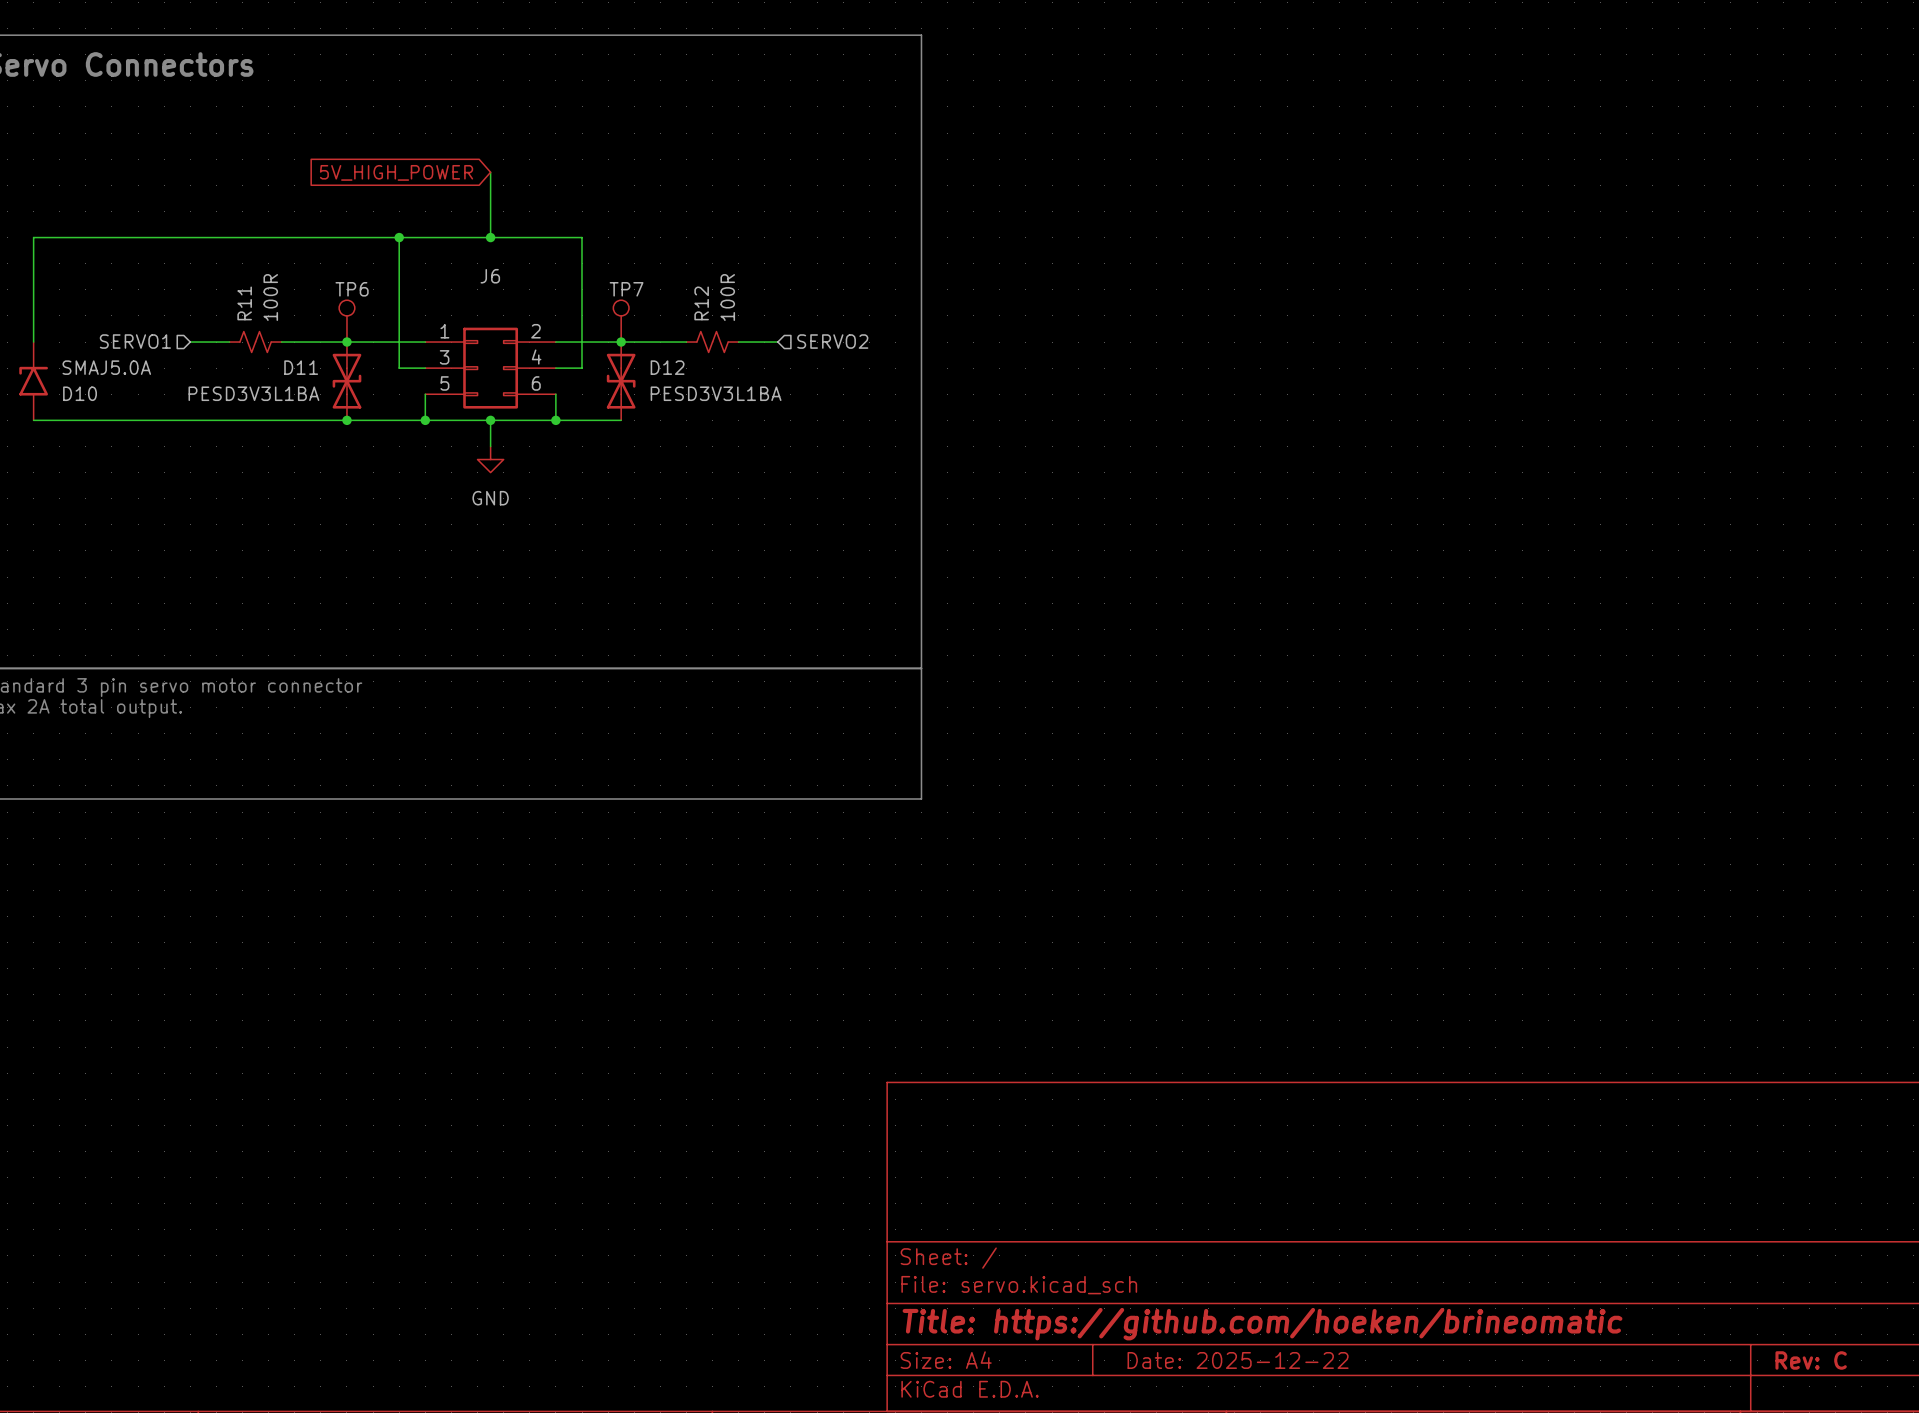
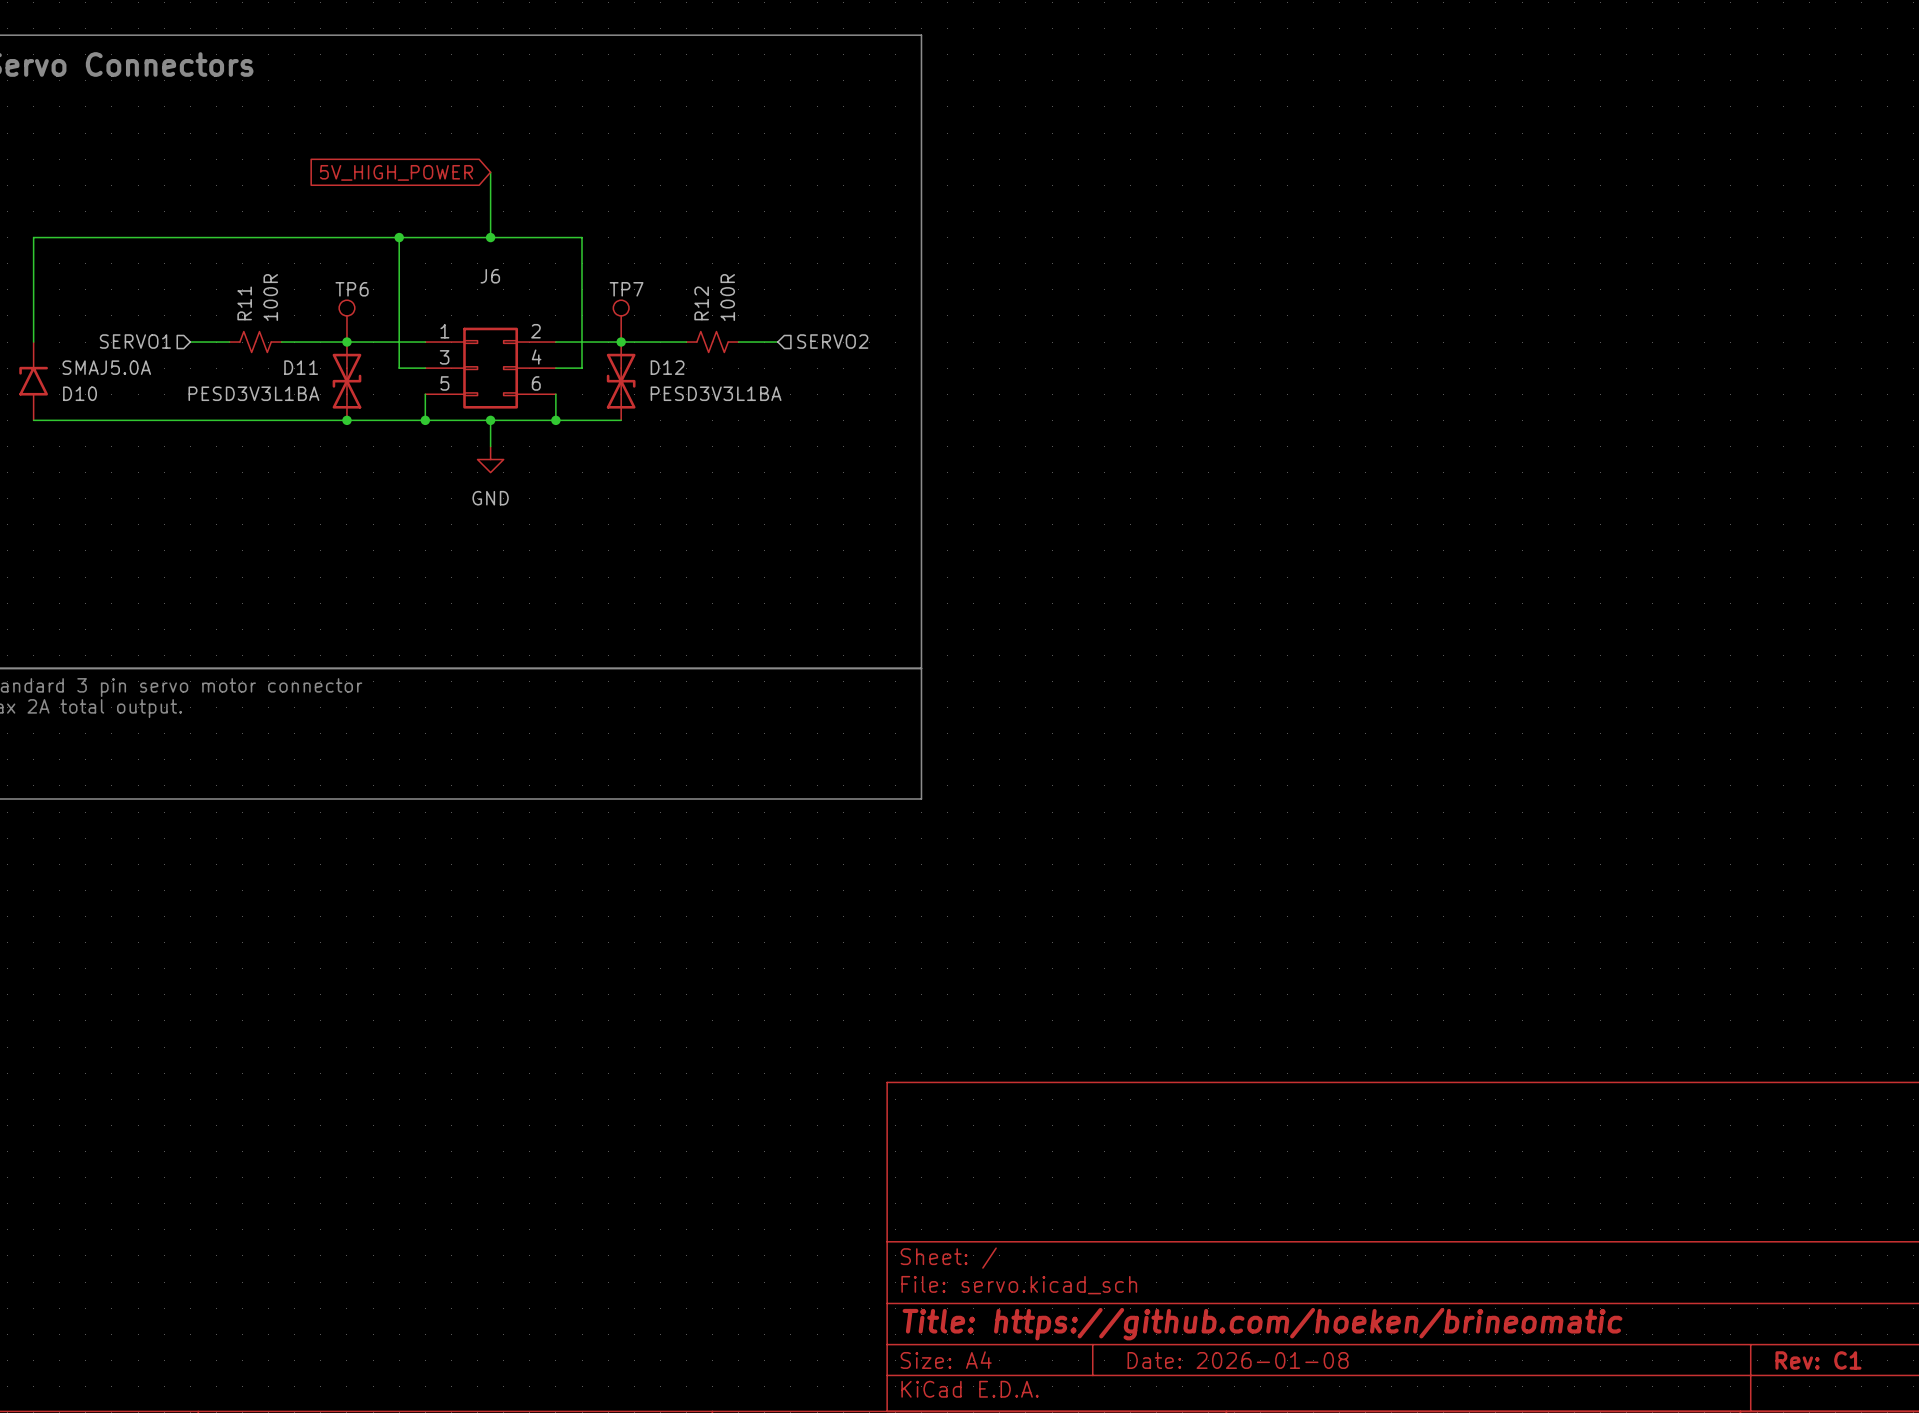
title block: Date: 2025-12-22 (1238, 1360) -> Date: 2026-01-08 (1238, 1360)
title block: Rev: C (1811, 1360) -> Rev: C1 (1818, 1360)

